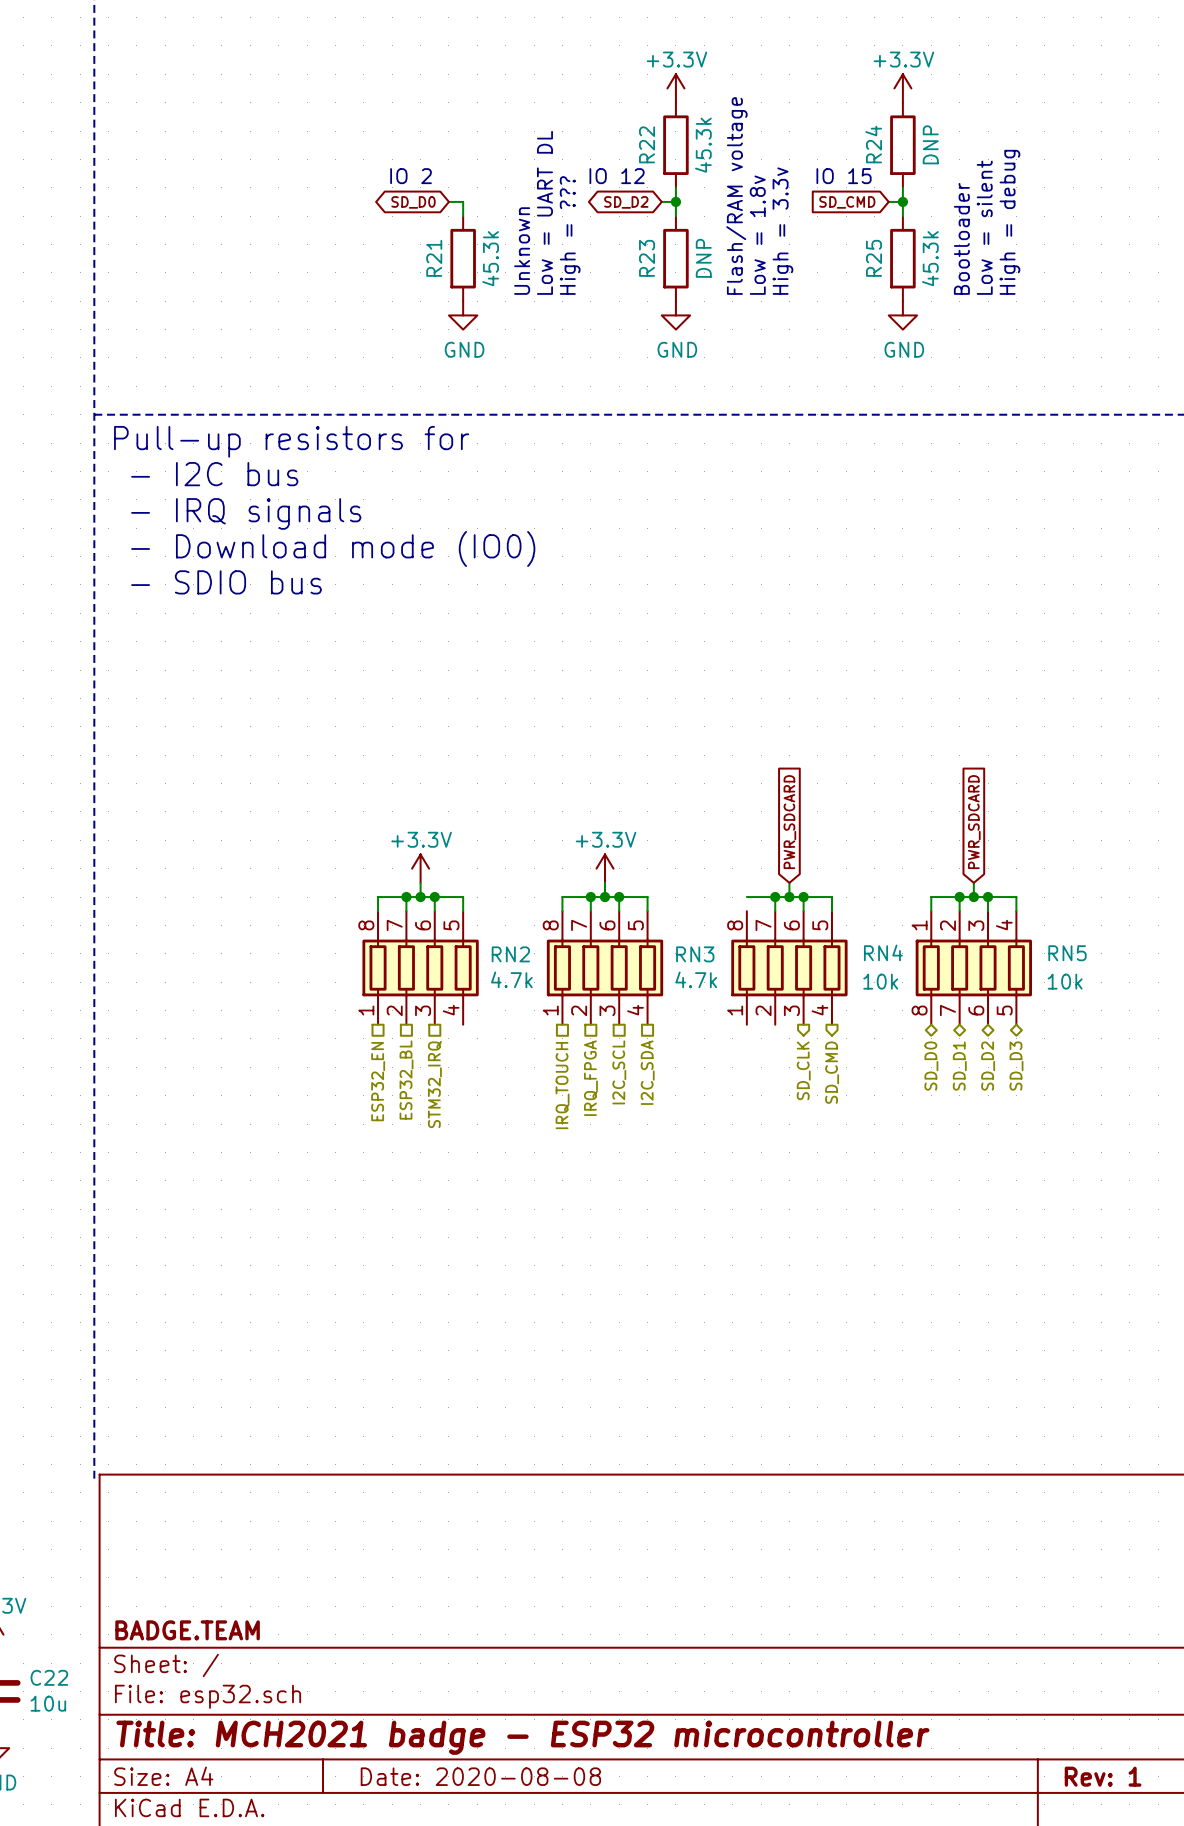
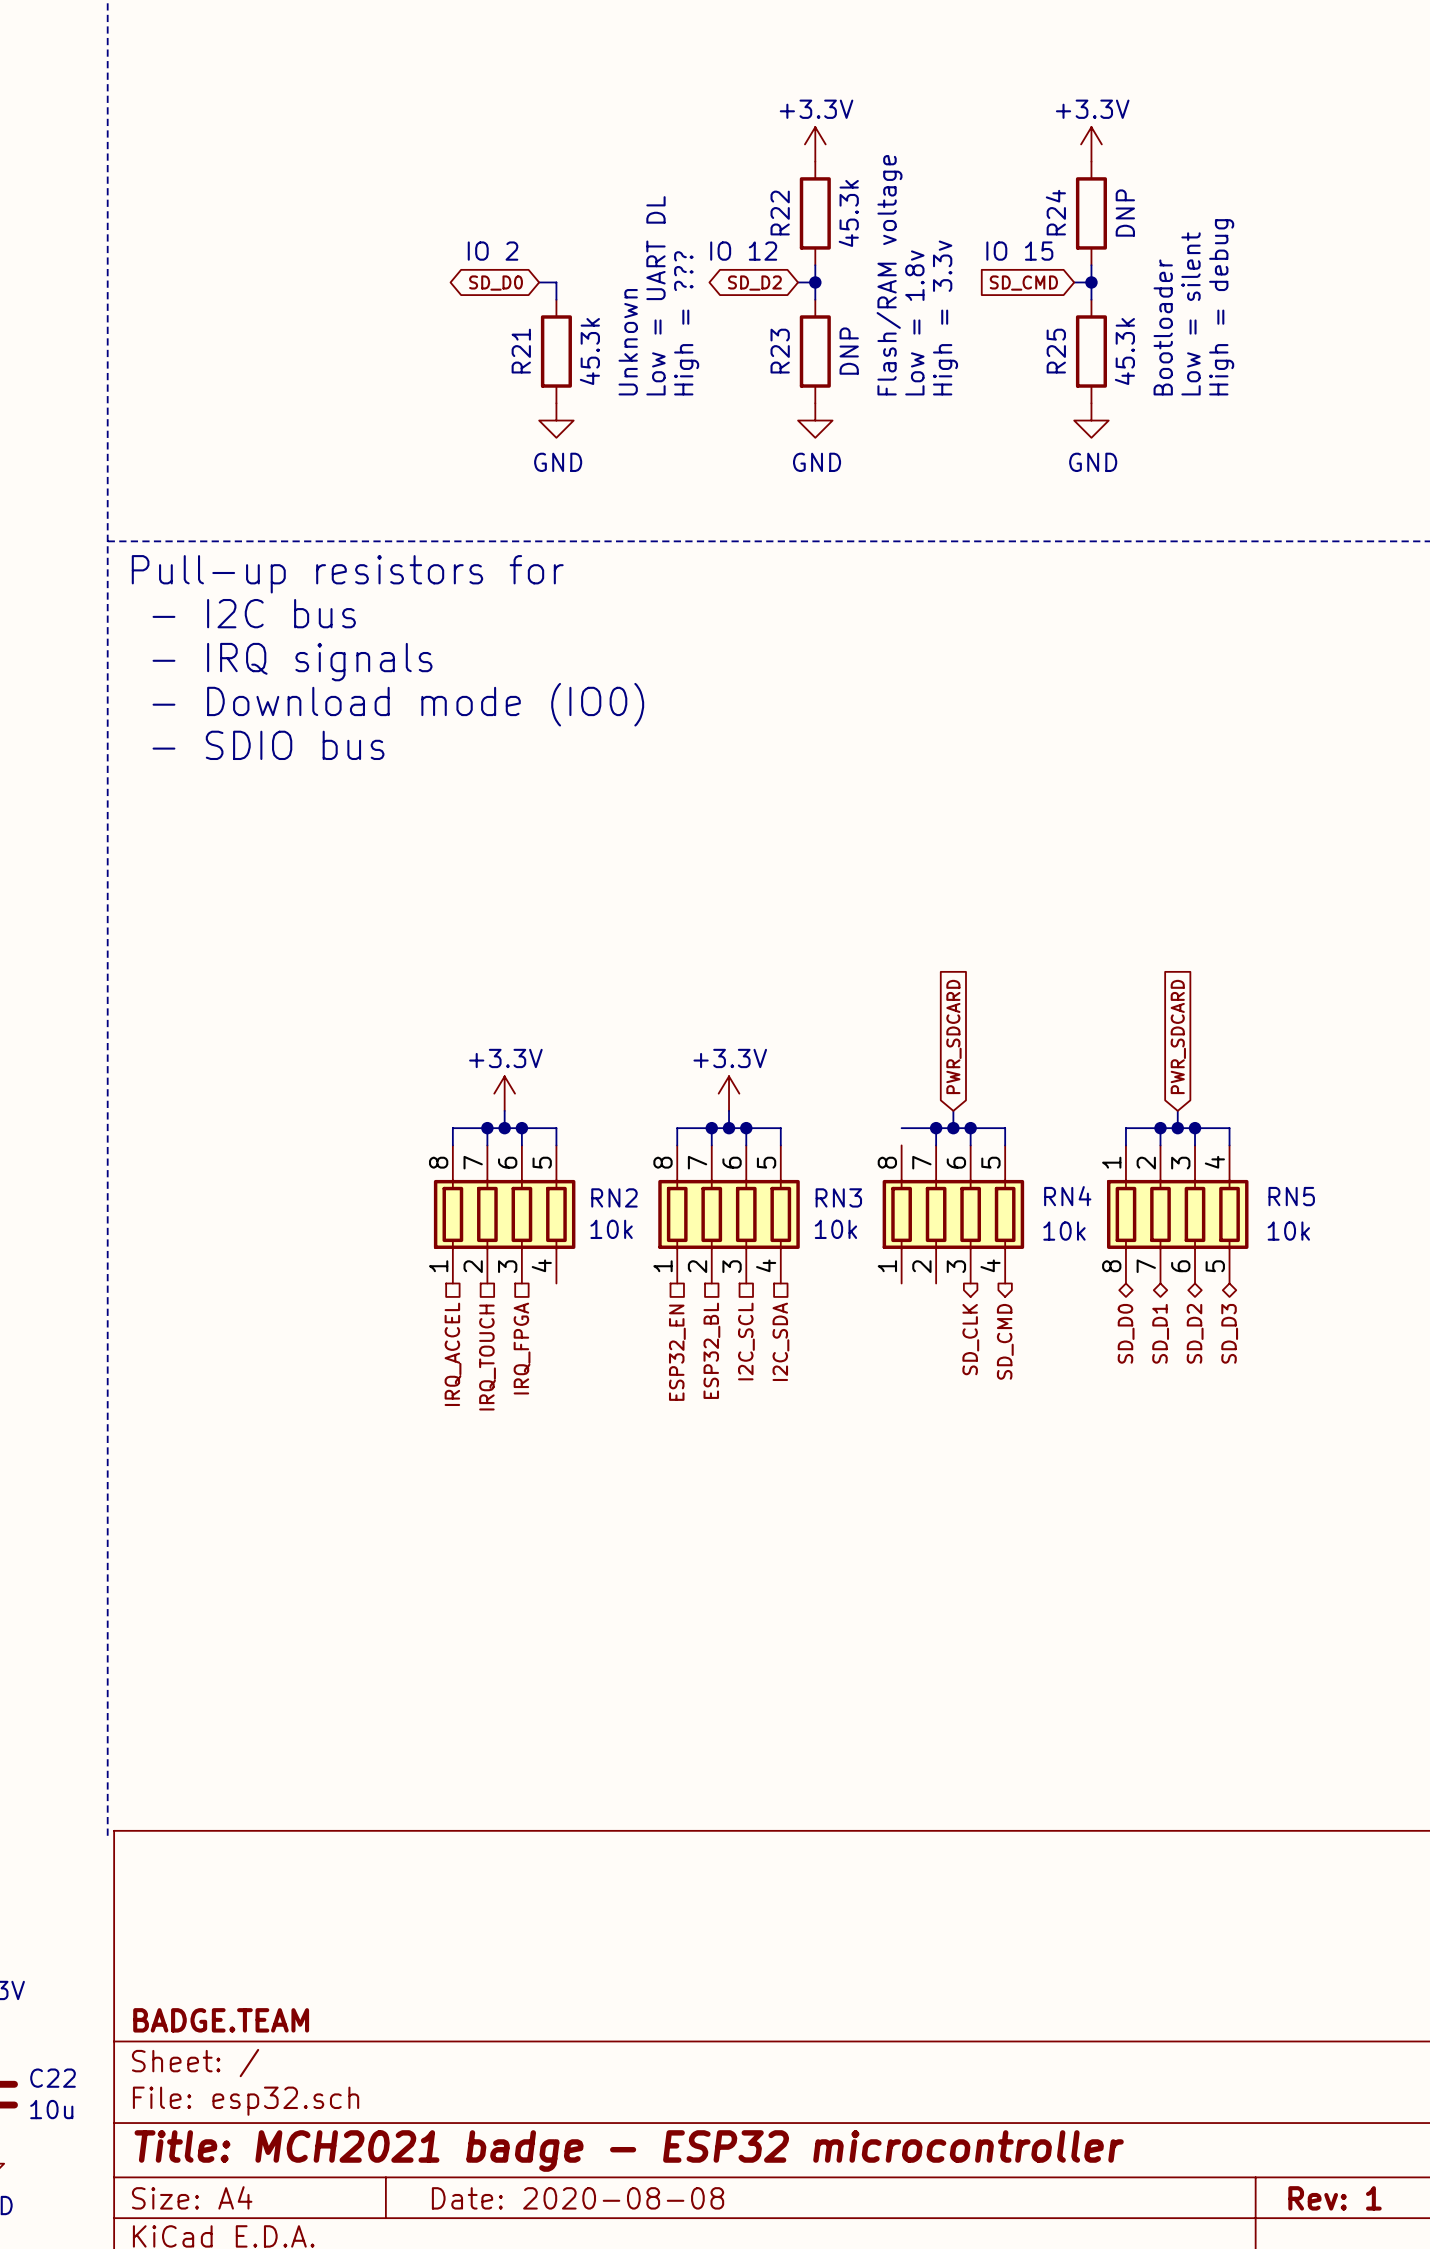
RN2 value: 4.7k (511, 979) -> 10k (611, 1229)
RN3 value: 4.7k (696, 979) -> 10k (835, 1229)
hierarchical label: IRQ_FPGA (590, 1078) -> ESP32_BL (711, 1350)
hierarchical label: ESP32_BL (406, 1080) -> IRQ_TOUCH (487, 1357)
hierarchical label: ESP32_EN (378, 1081) -> IRQ_ACCEL (453, 1354)
hierarchical label: STM32_IRQ (434, 1084) -> IRQ_FPGA (522, 1348)
hierarchical label: IRQ_TOUCH (562, 1085) -> ESP32_EN (677, 1352)

